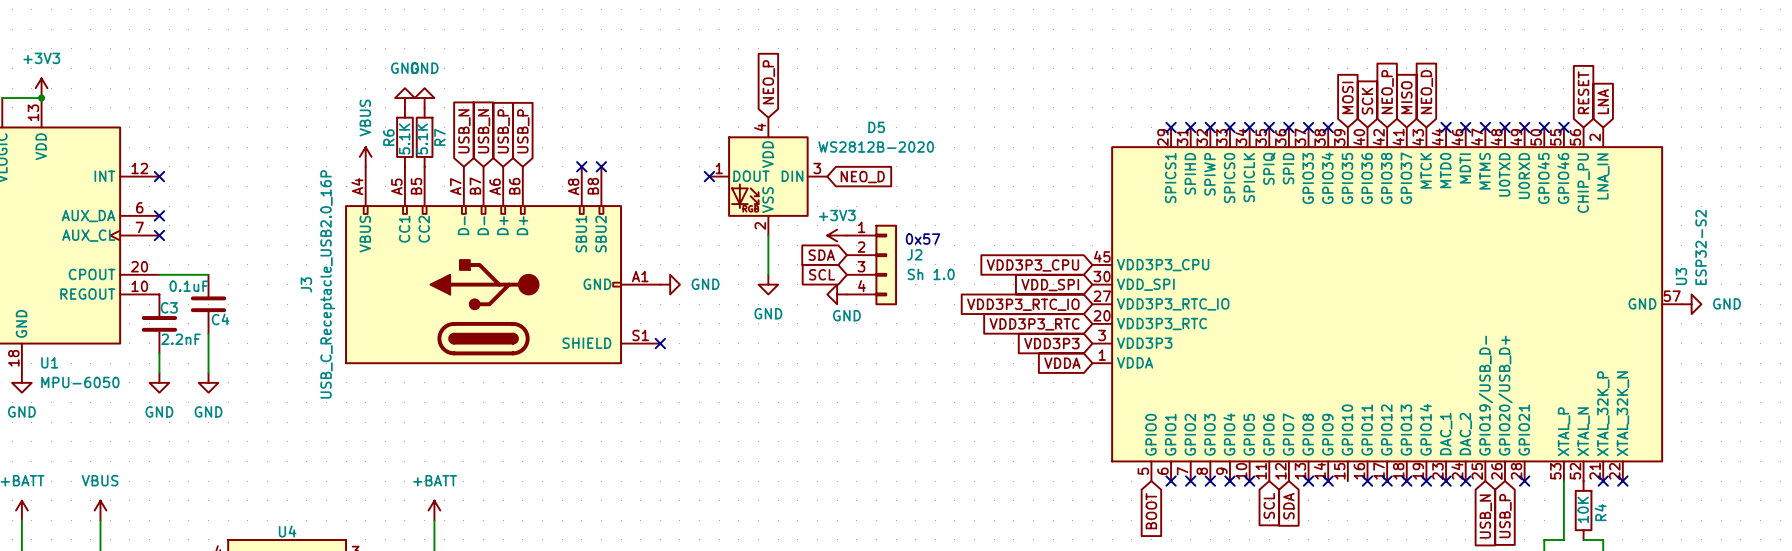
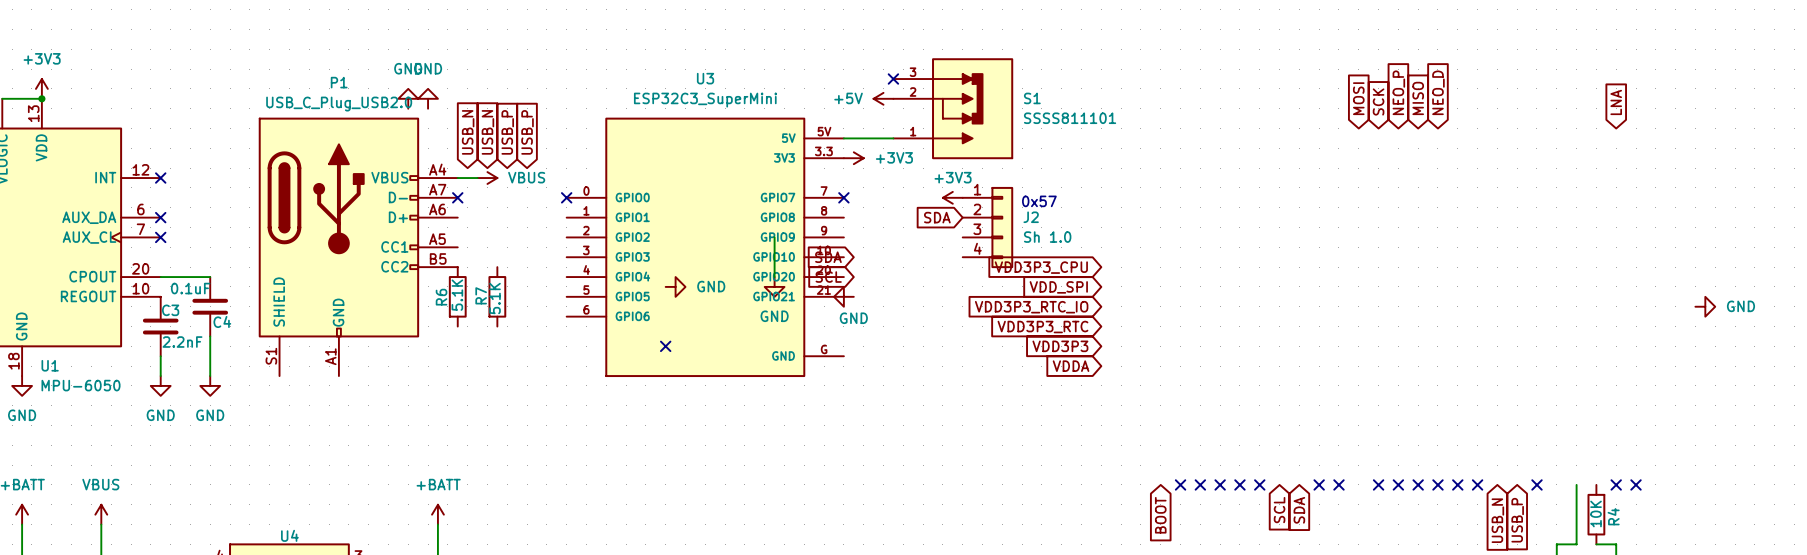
no-connect mark: none -> (893, 79)
global label: NEO_P (768, 82) -> none
global label: RESET (1583, 92) -> none
power symbol: none -> +5V (883, 98)
S1: none -> SSSS811101 (953, 108)
U3 symbol: [1092, 127, 1682, 482] -> [566, 117, 844, 378]
no-connect mark: (1171, 127) -> none
no-connect mark: (1190, 127) -> none
no-connect mark: (1210, 127) -> none
no-connect mark: (1229, 127) -> none
no-connect mark: (1249, 127) -> none
no-connect mark: (1269, 127) -> none
no-connect mark: (1288, 127) -> none
no-connect mark: (1308, 127) -> none
no-connect mark: (1328, 127) -> none
no-connect mark: (1446, 127) -> none
no-connect mark: (1465, 127) -> none
no-connect mark: (1485, 127) -> none
no-connect mark: (1505, 127) -> none
no-connect mark: (1524, 127) -> none
no-connect mark: (1544, 127) -> none
no-connect mark: (1563, 127) -> none
R6 position: (404, 137) -> (457, 296)
R7 position: (424, 137) -> (497, 296)
R7 name position: R7 (439, 137) -> R7 (481, 295)
wire: none -> (843, 138) (893, 138)
R6 value position: 5.1K (404, 138) -> 5.1K (457, 295)
power symbol rotation: 0° (365, 156) -> 90° clockwise (487, 178)
power symbol position: VBUS (365, 156) -> VBUS (487, 178)
power symbol: none -> +3V3 (853, 158)
no-connect mark: (581, 166) -> none
no-connect mark: (601, 166) -> none
wire: none -> (457, 178) (477, 178)
no-connect mark: (709, 176) -> none
D5: WS2812B-2020 (768, 176) -> none
global label: NEO_D (862, 177) -> none
no-connect mark: none -> (457, 197)
no-connect mark: none -> (566, 197)
no-connect mark: none -> (843, 197)
power symbol: none -> +3V3 (952, 197)
global label: none -> SDA (937, 217)
power symbol: +3V3 (837, 235) -> none
text position: 0x57 (923, 239) -> 0x57 (1039, 201)
P1: none -> USB_C_Plug_USB2.0 (358, 246)
U3 value: ESP32-S2 (1701, 247) -> ESP32C3_SuperMini (705, 100)
J2 position: (871, 264) -> (987, 227)
J3: USB_C_Receptacle_USB2.0_16P (502, 265) -> none
U3 name position: U3 (1681, 276) -> U3 (705, 78)

